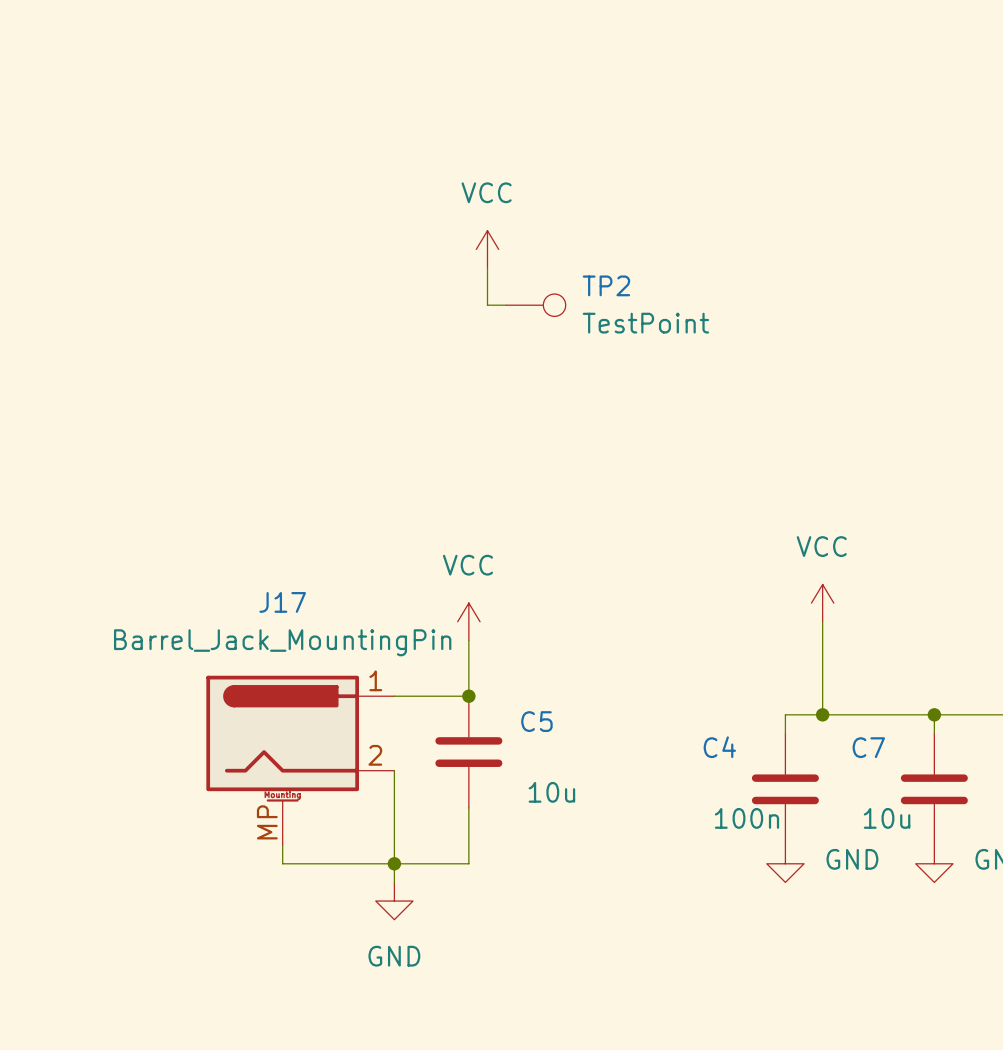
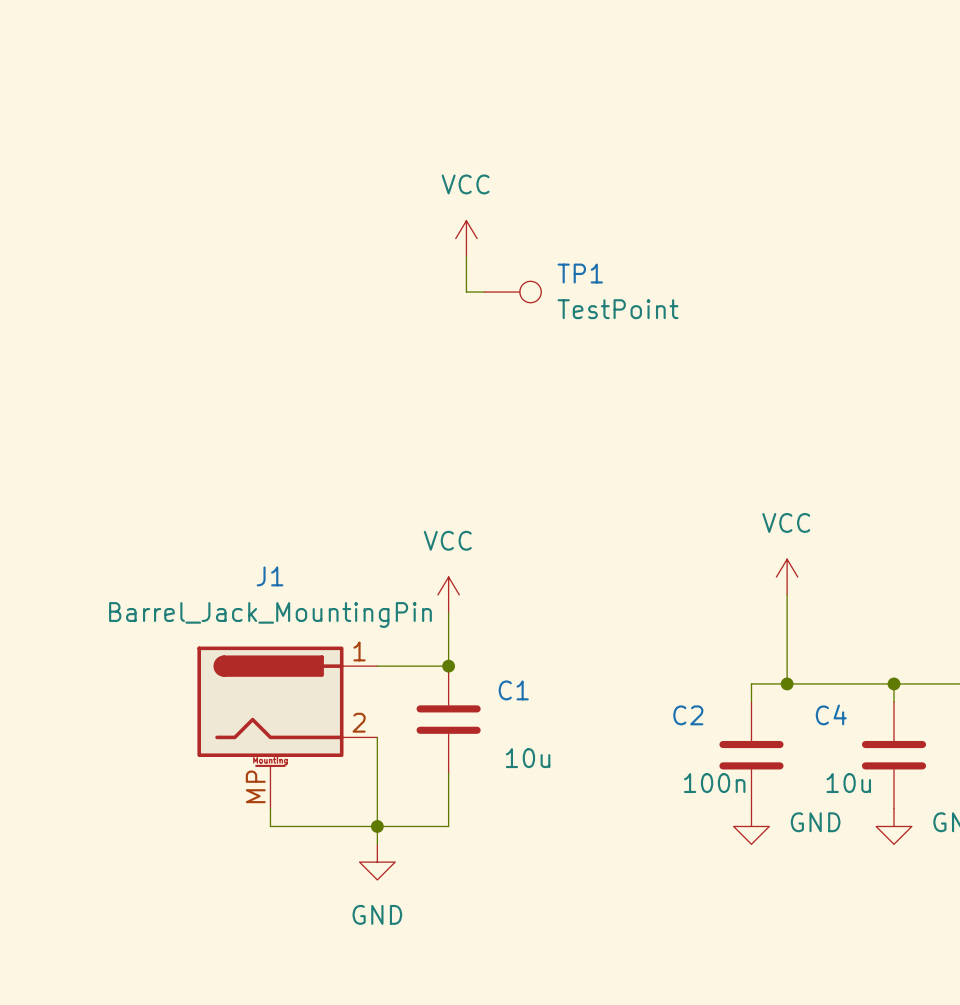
TP2 name: TP2 (606, 285) -> TP1 (580, 273)
J17 name: J17 (282, 602) -> J1 (270, 576)
C5 name: C5 (536, 721) -> C1 (513, 690)
C4 name: C4 (719, 747) -> C2 (688, 715)
C7 name: C7 (868, 747) -> C4 (831, 714)

